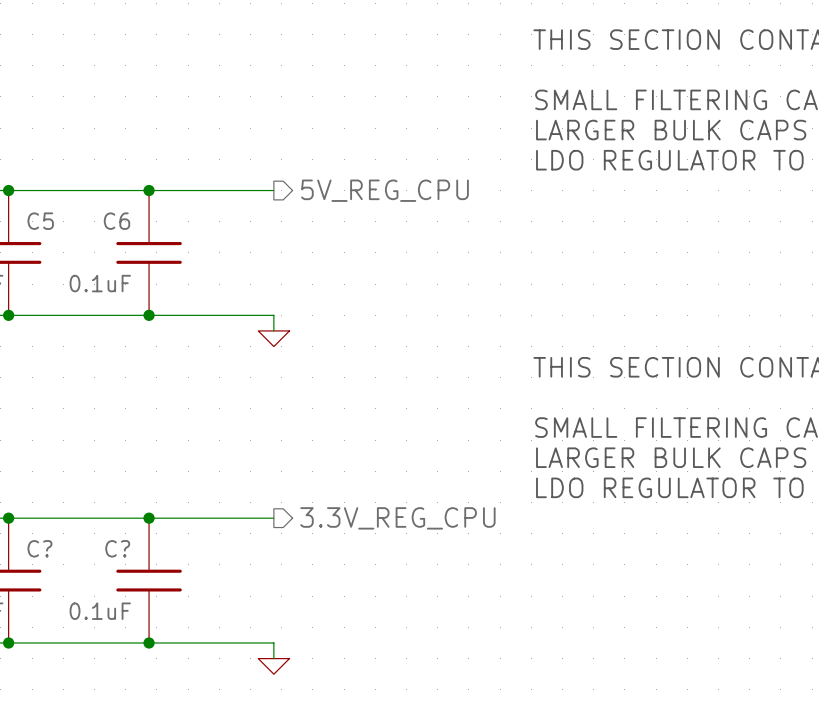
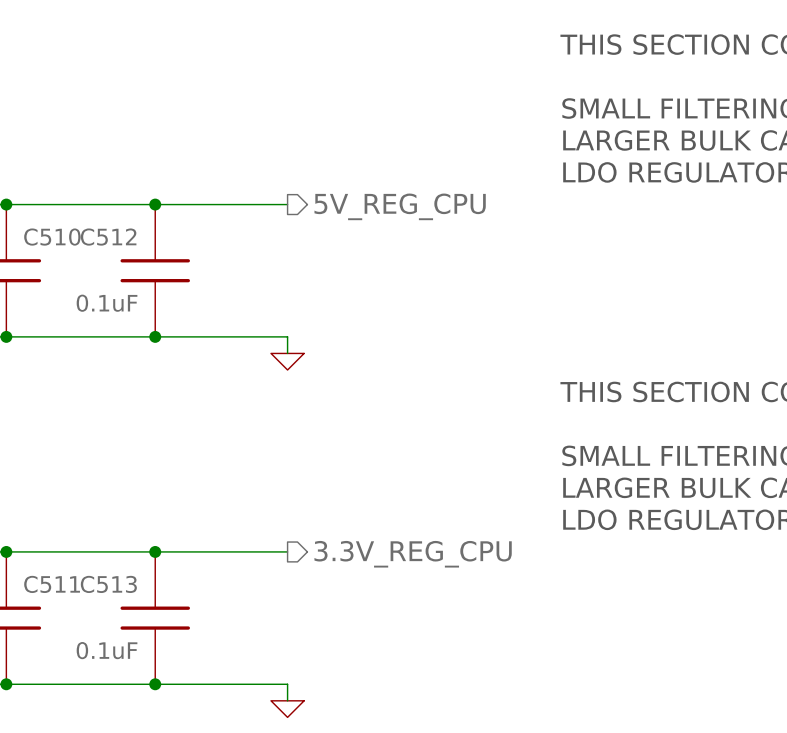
C5 name: C5 (40, 221) -> C510 (52, 237)
C6 name: C6 (116, 221) -> C512 (108, 237)
C? name: C? (39, 548) -> C511 (52, 584)
C? name: C? (117, 548) -> C513 (108, 584)

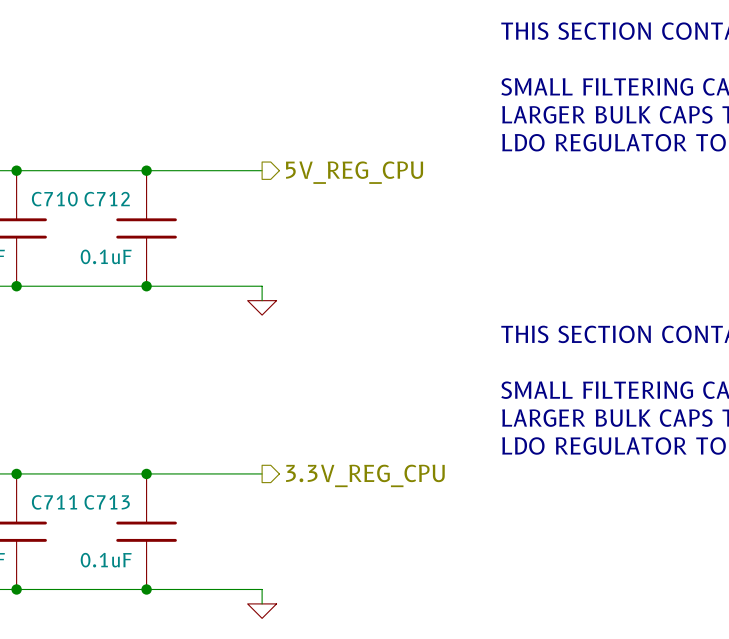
C510 name: C510 (52, 237) -> C710 (54, 199)
C512 name: C512 (108, 237) -> C712 (107, 199)
C511 name: C511 (52, 584) -> C711 (54, 502)
C513 name: C513 (108, 584) -> C713 (107, 502)

